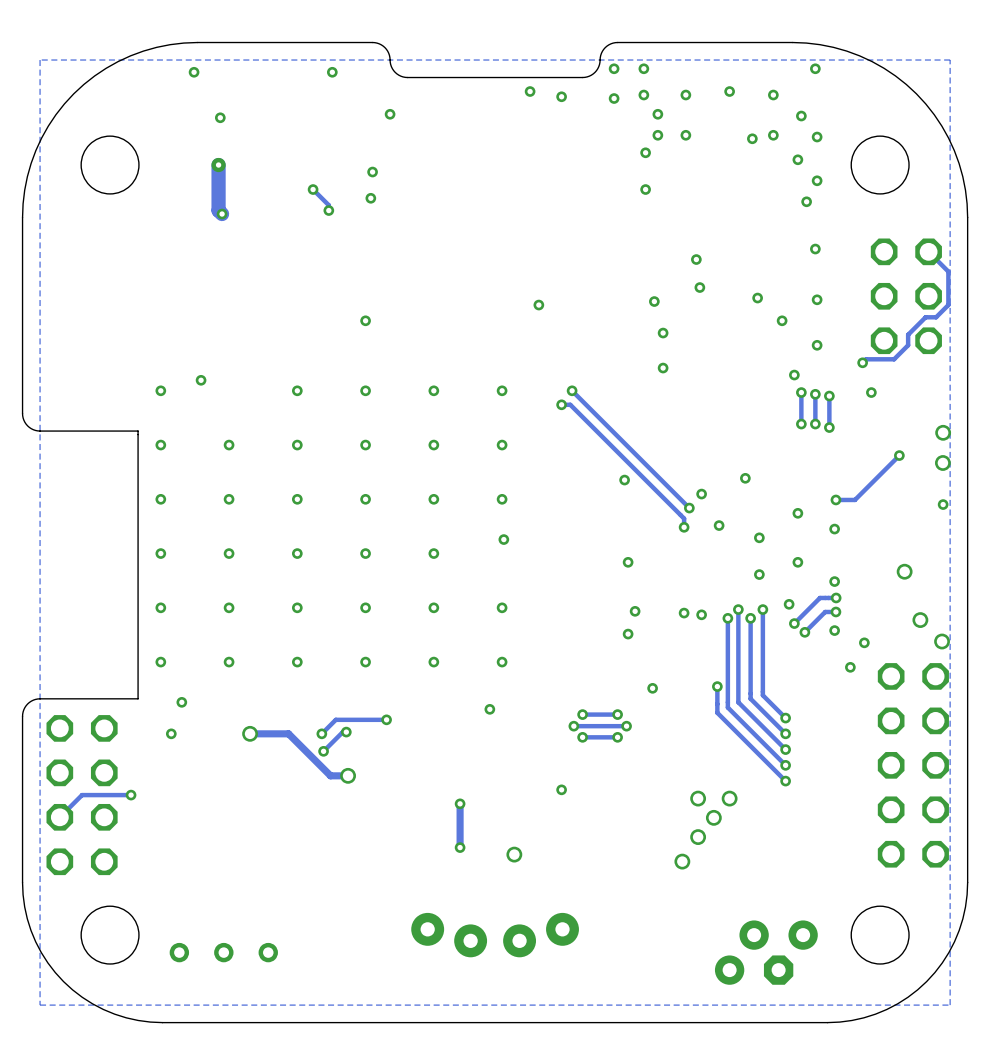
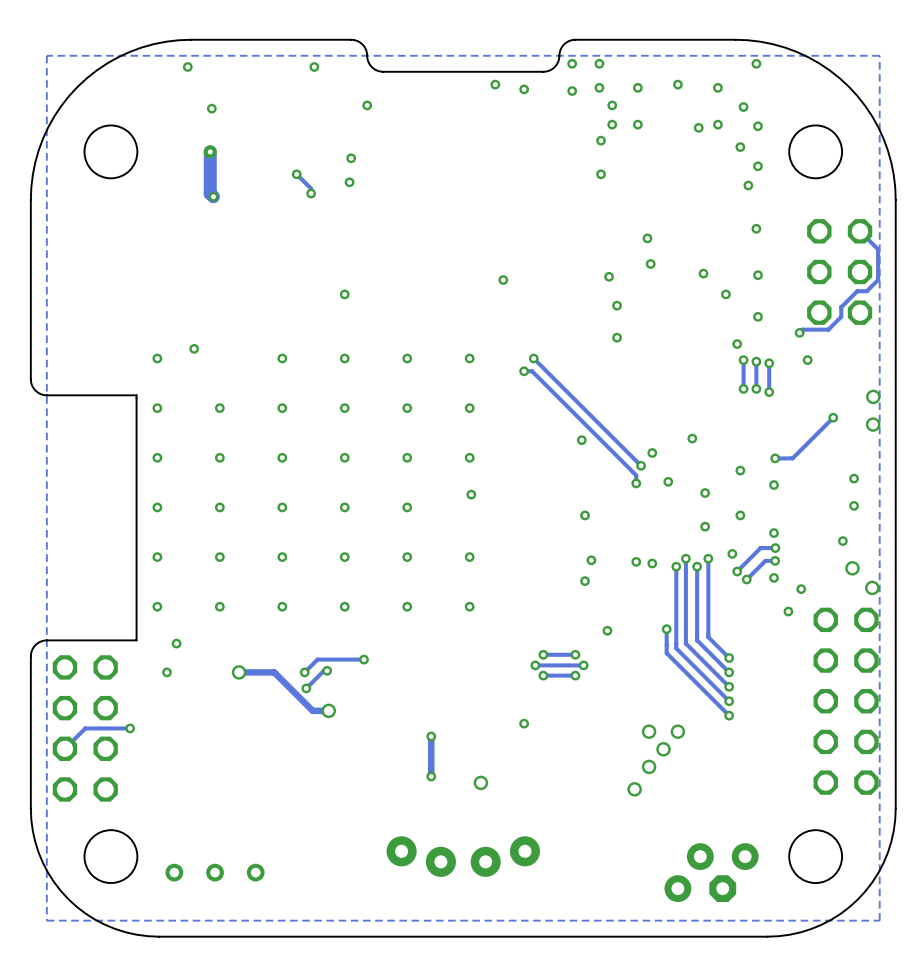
via: (943, 504) -> none
via: none -> (854, 478)
via: none -> (854, 505)
via: (904, 571) -> none
via: none -> (842, 541)
via: (489, 709) -> none

